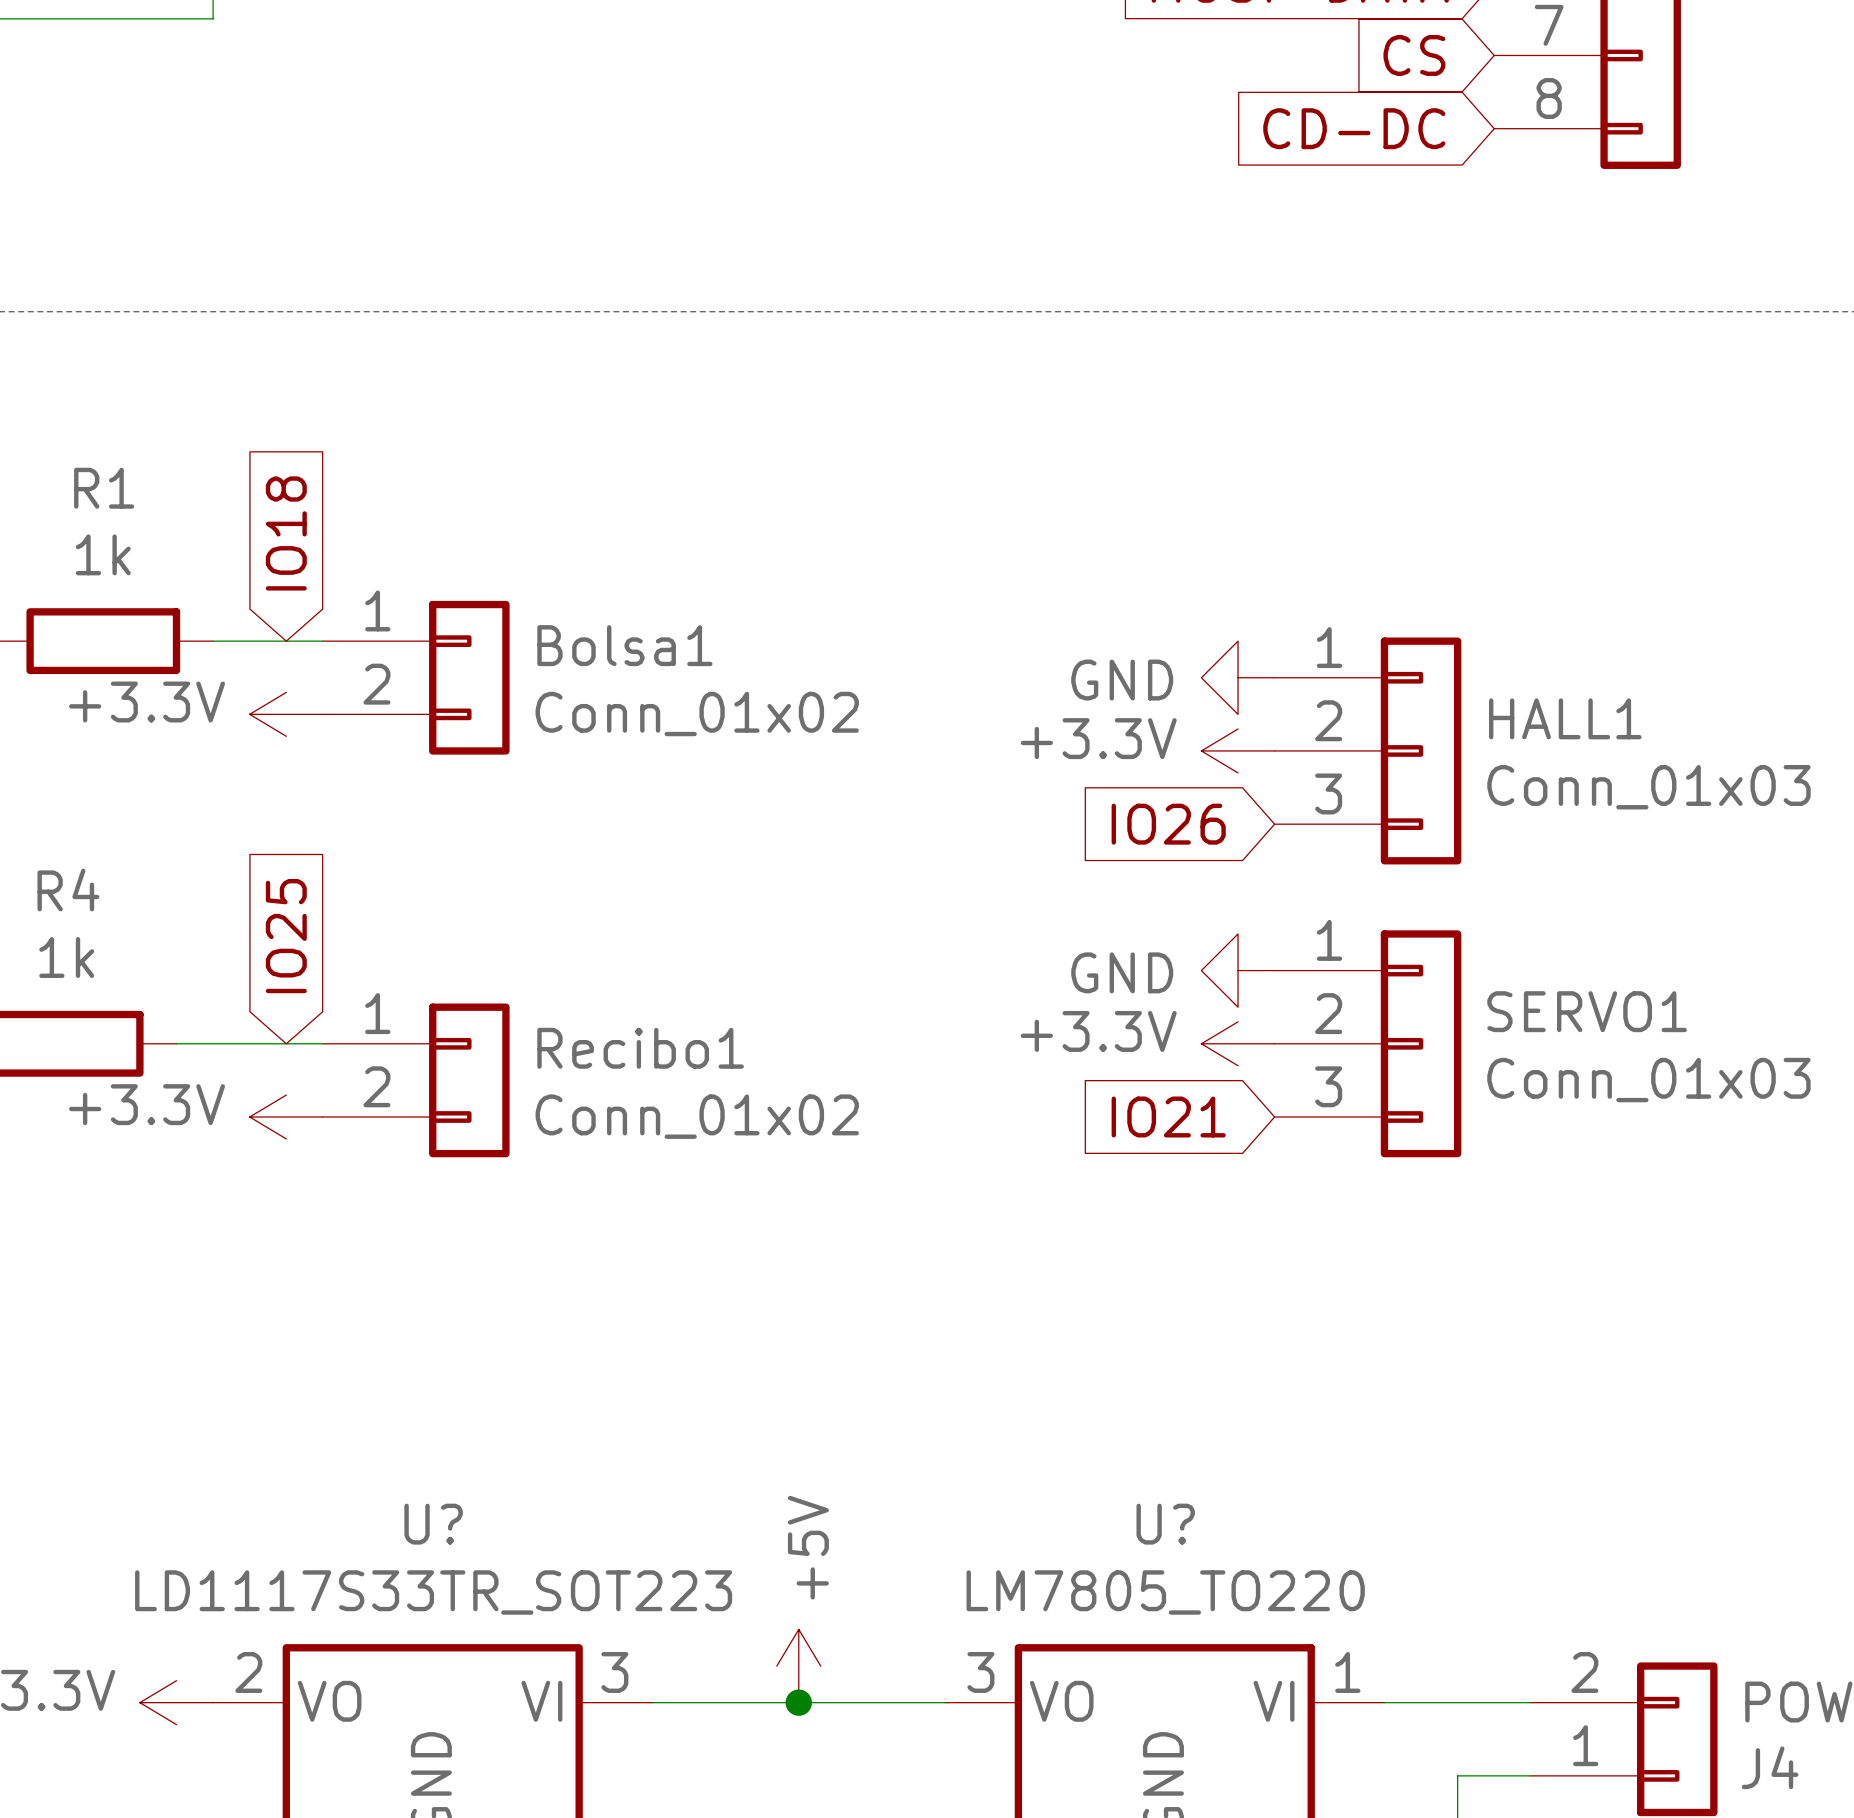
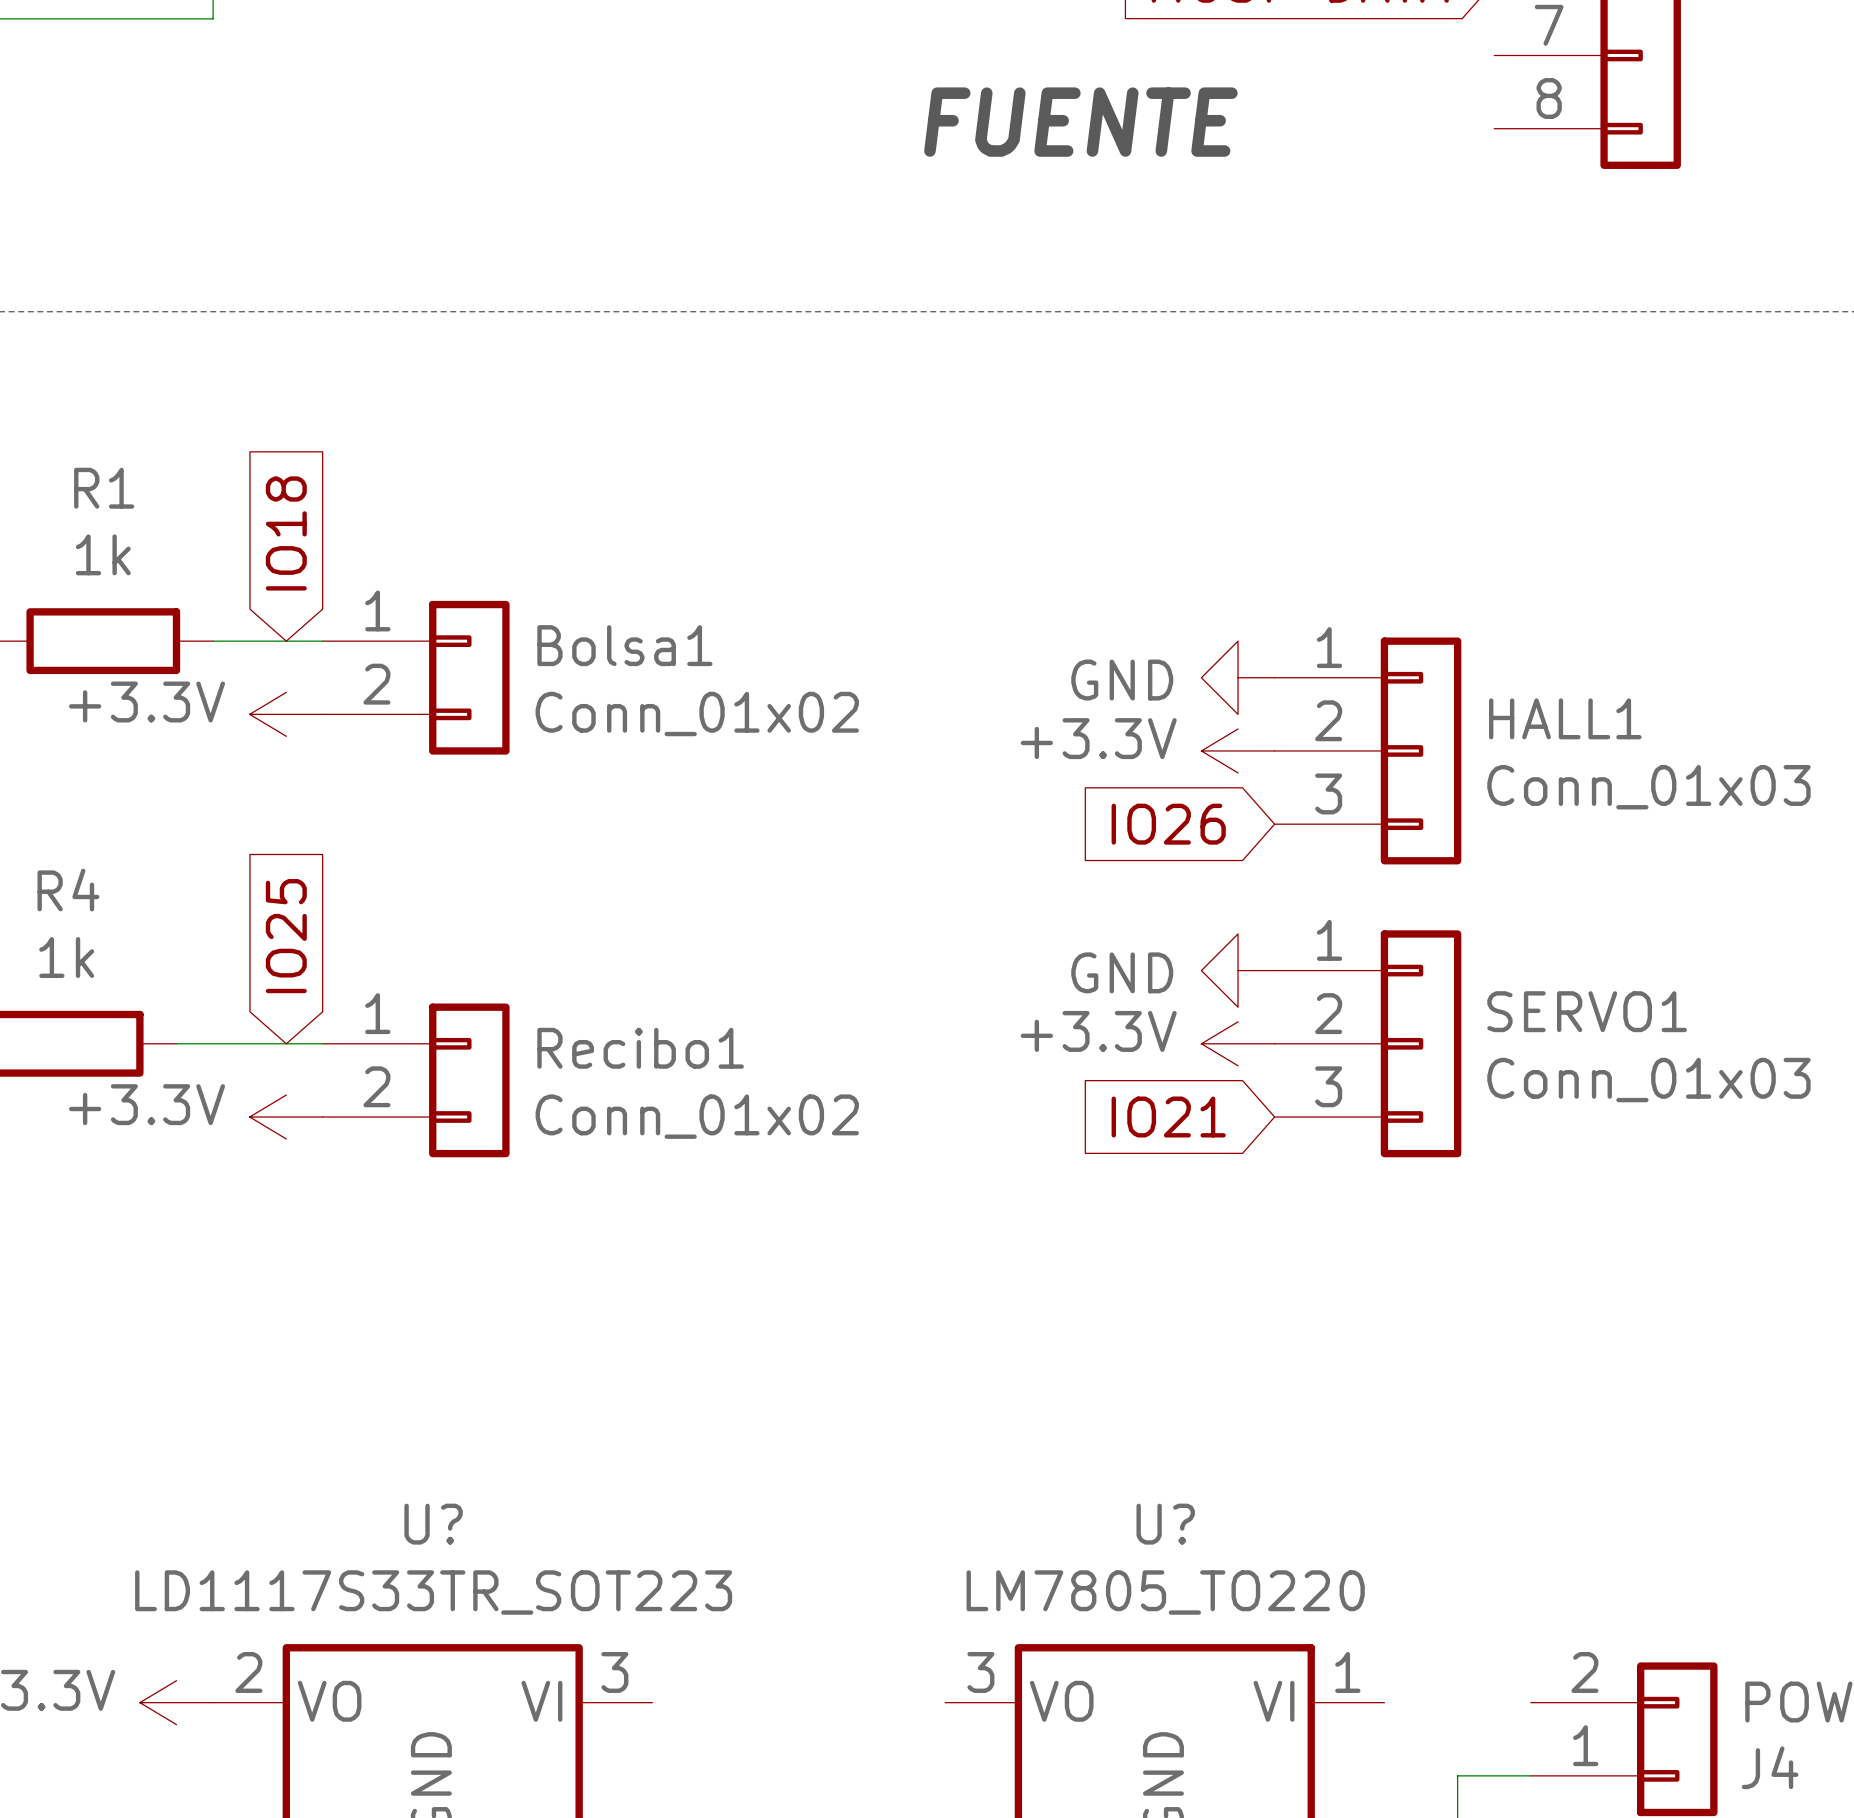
global label: CS (1414, 55) -> none
text: none -> FUENTE (1080, 122)
global label: CD-DC (1354, 128) -> none
power symbol: +5V (798, 1666) -> none
wire: (652, 1702) (945, 1702) -> none
junction: (798, 1702) -> none
wire: (1384, 1702) (1530, 1702) -> none

